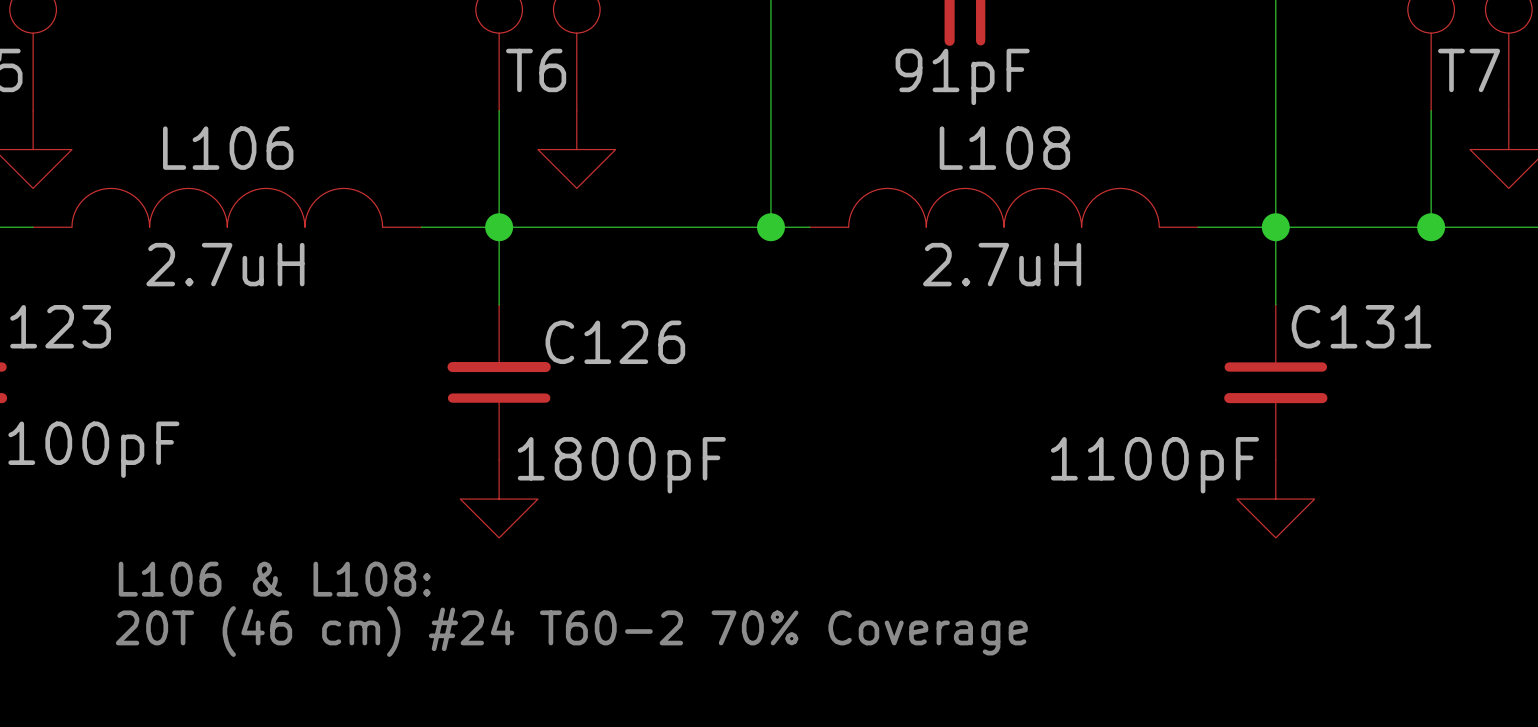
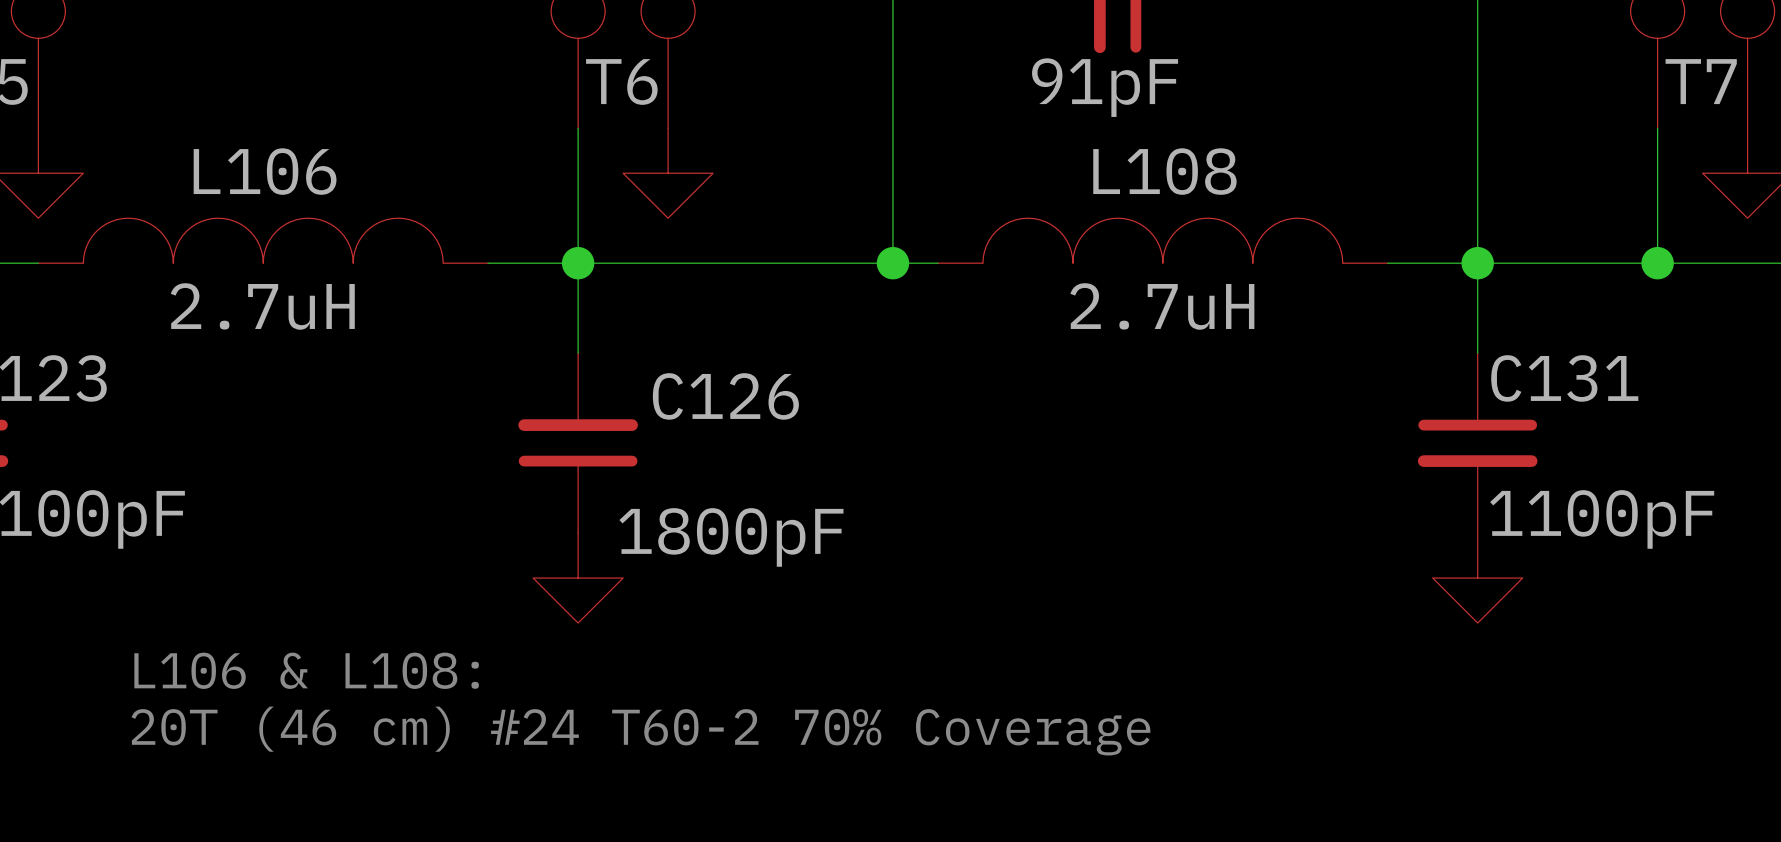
C131 value position: 1100pF (1154, 465) -> 1100pF (1602, 519)

